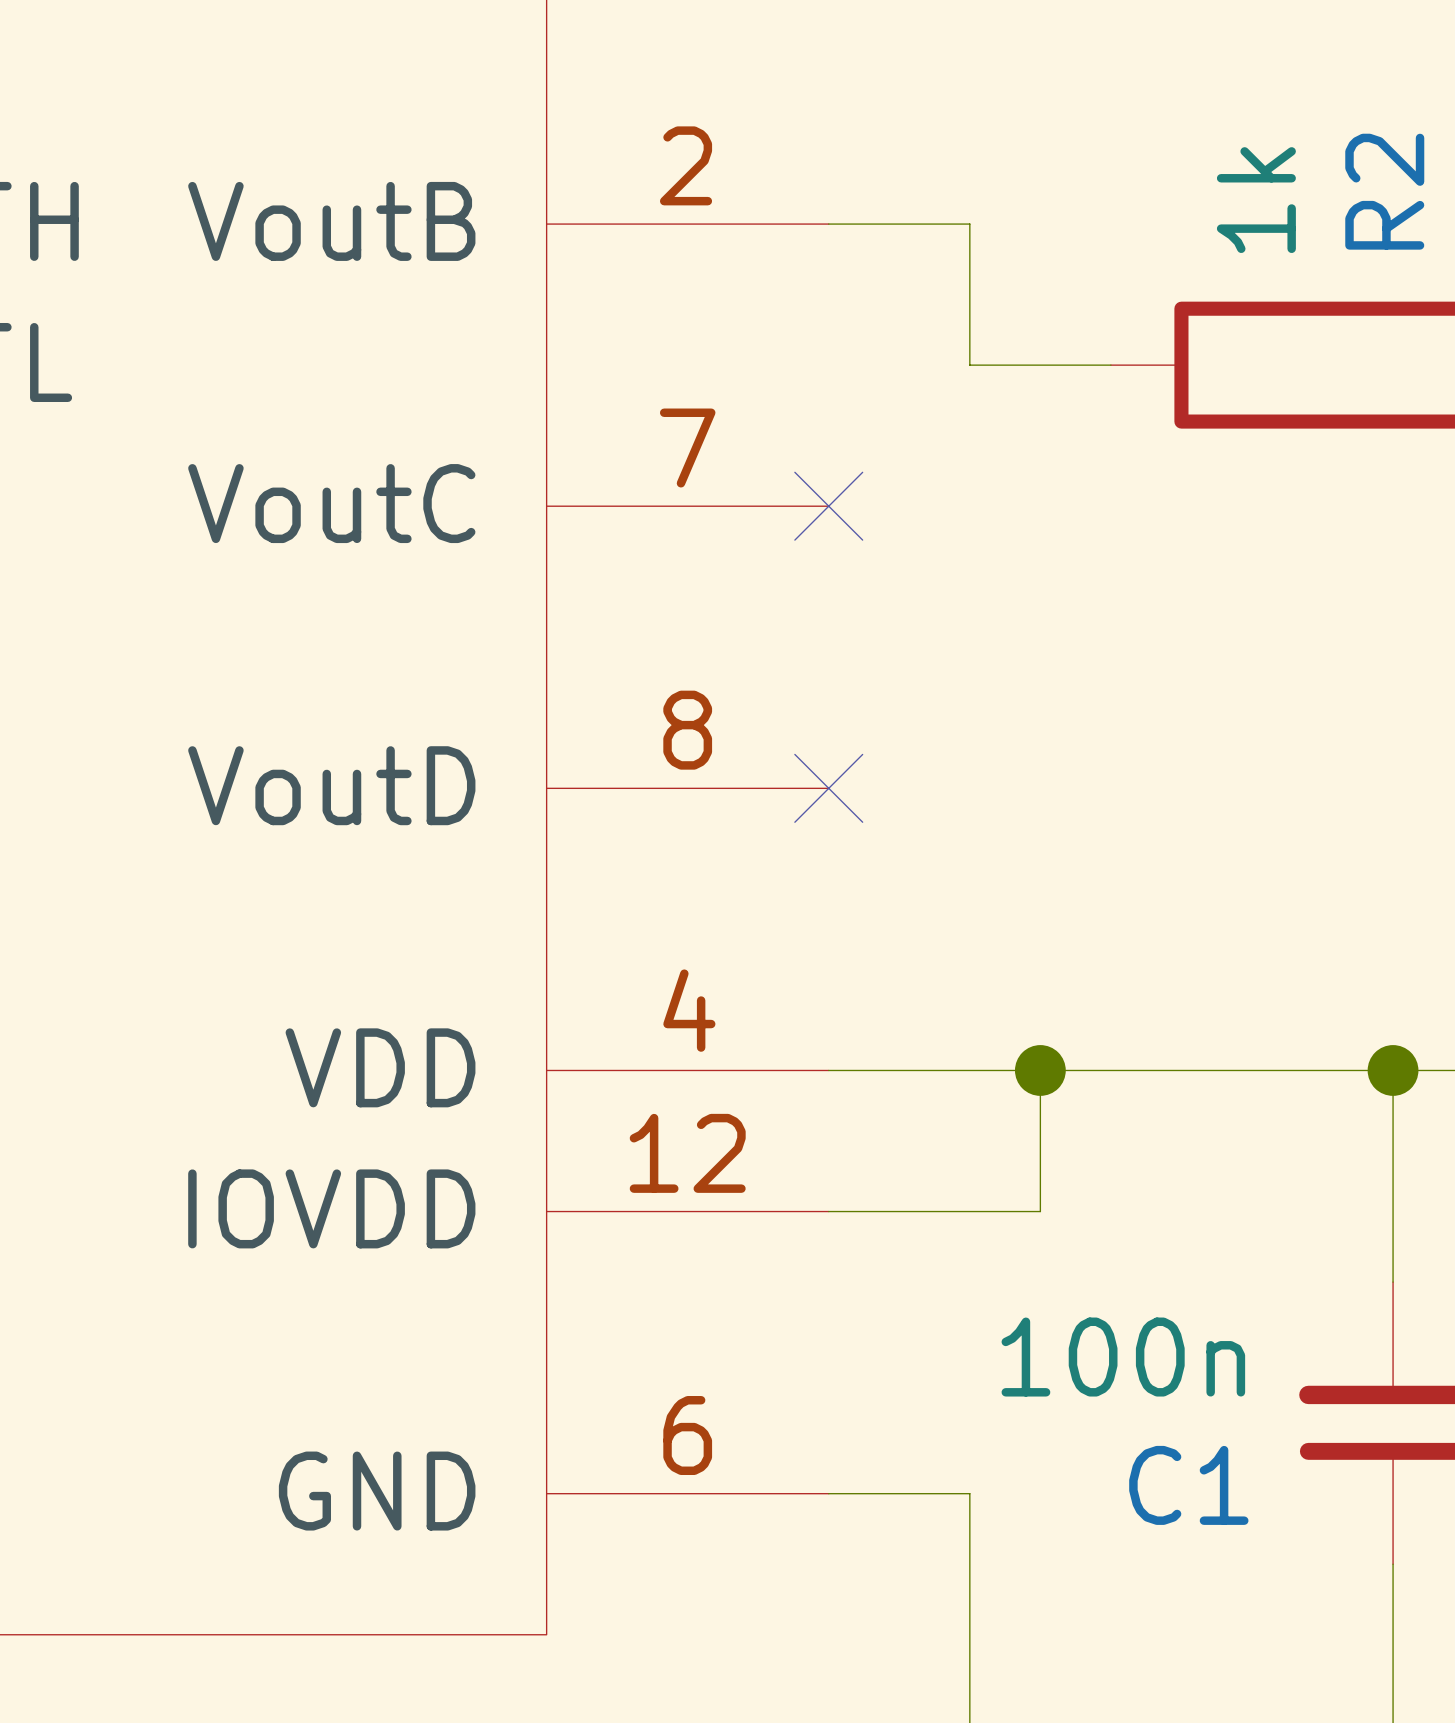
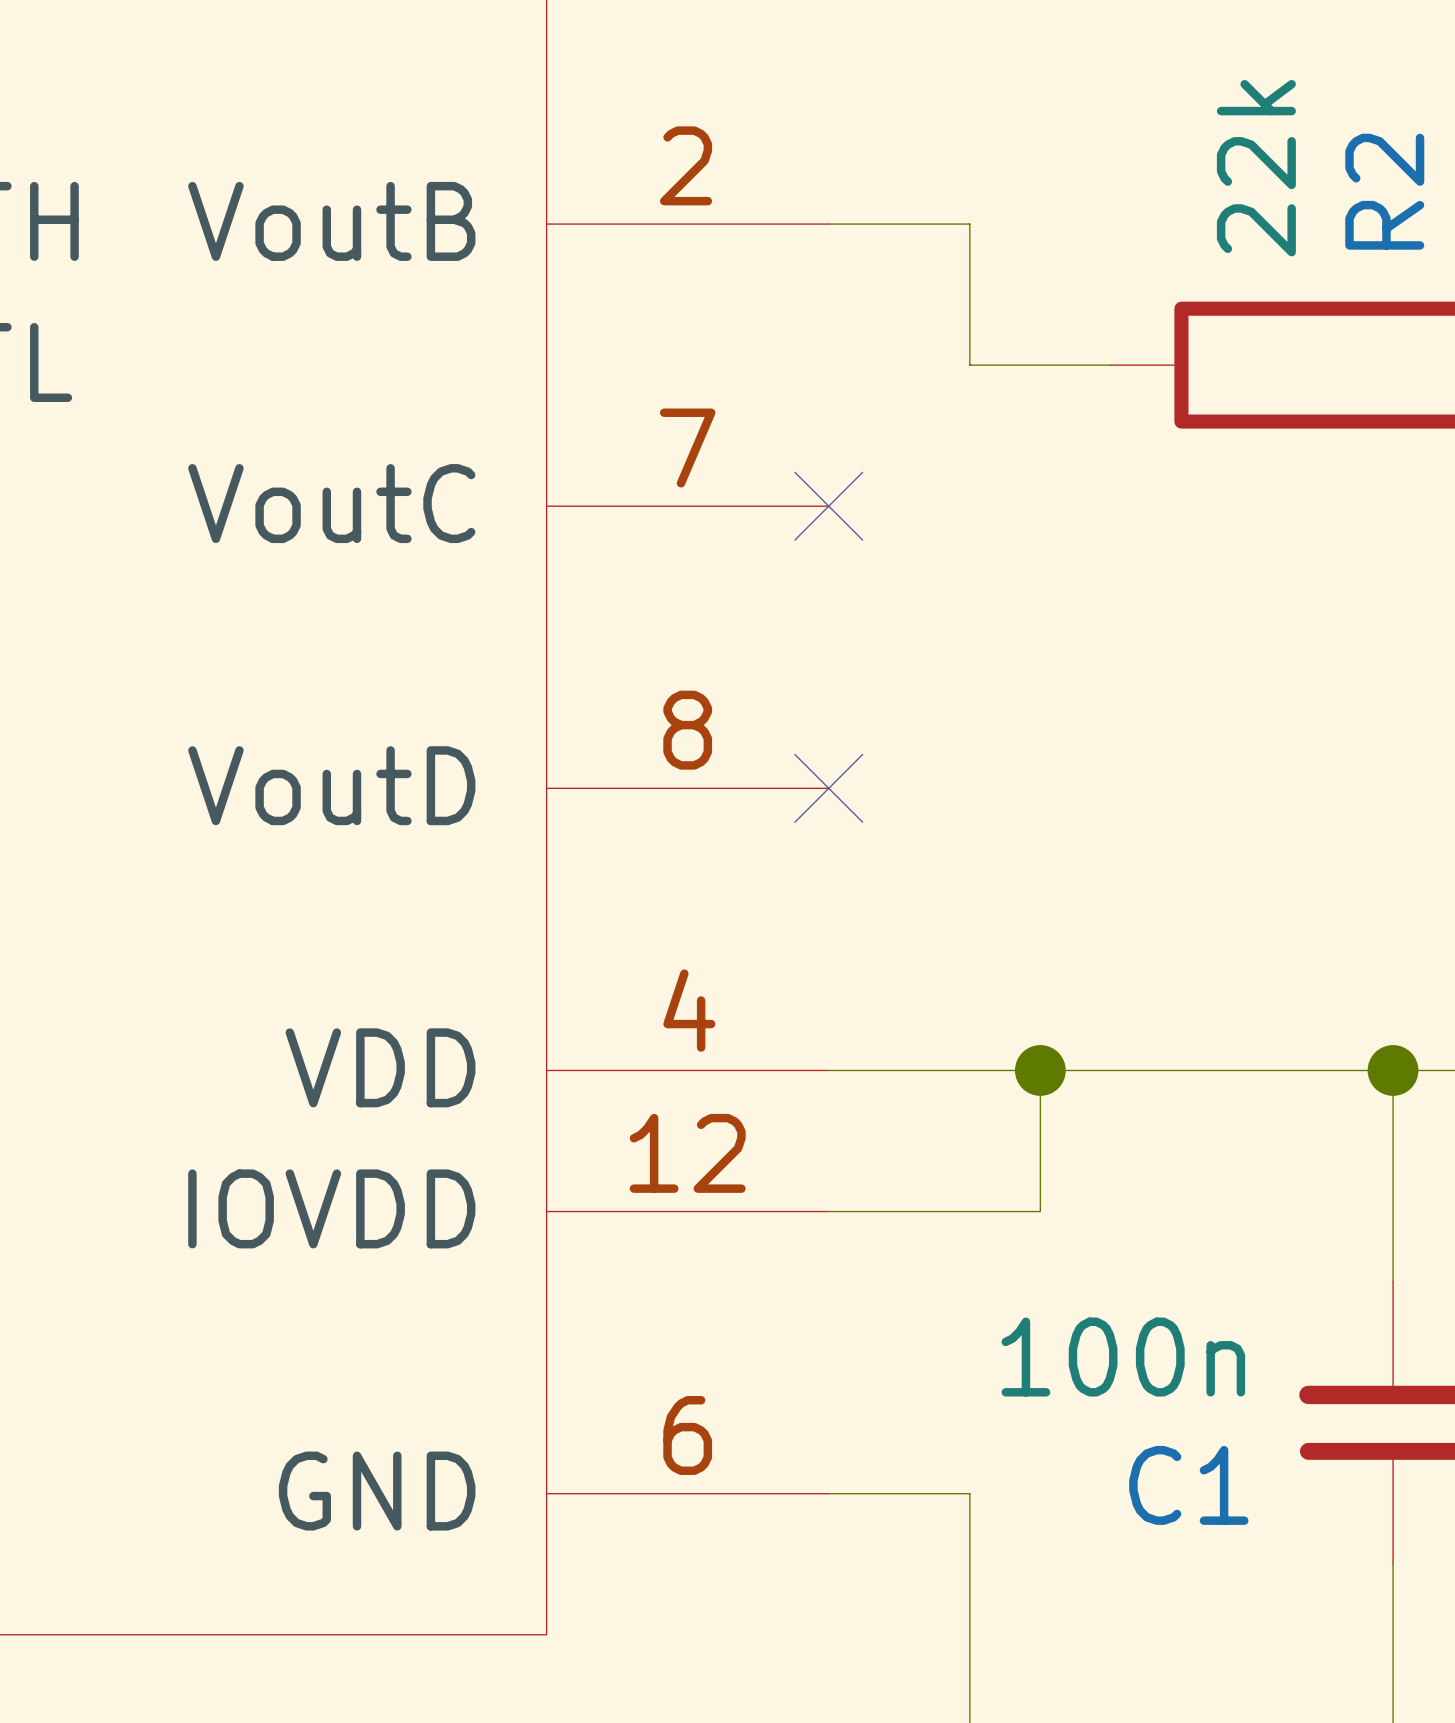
R2 value: 1k (1256, 200) -> 22k (1256, 168)

